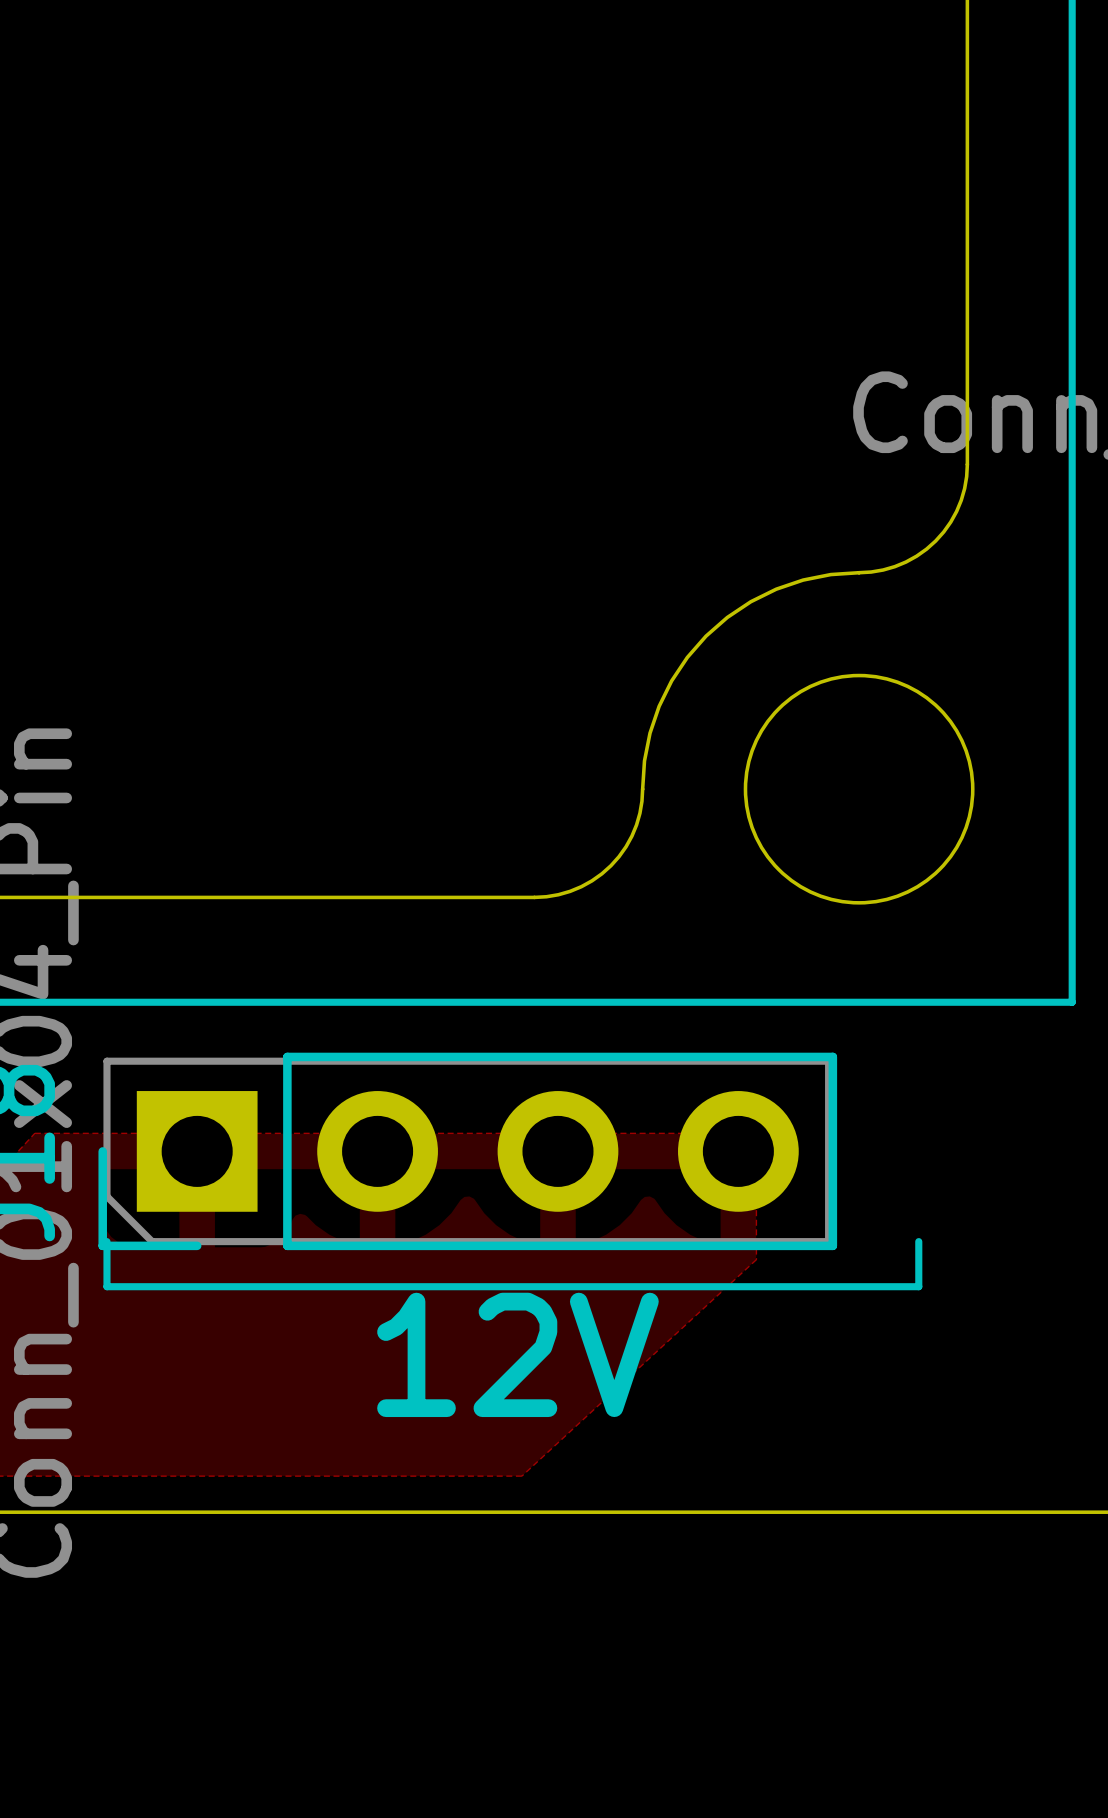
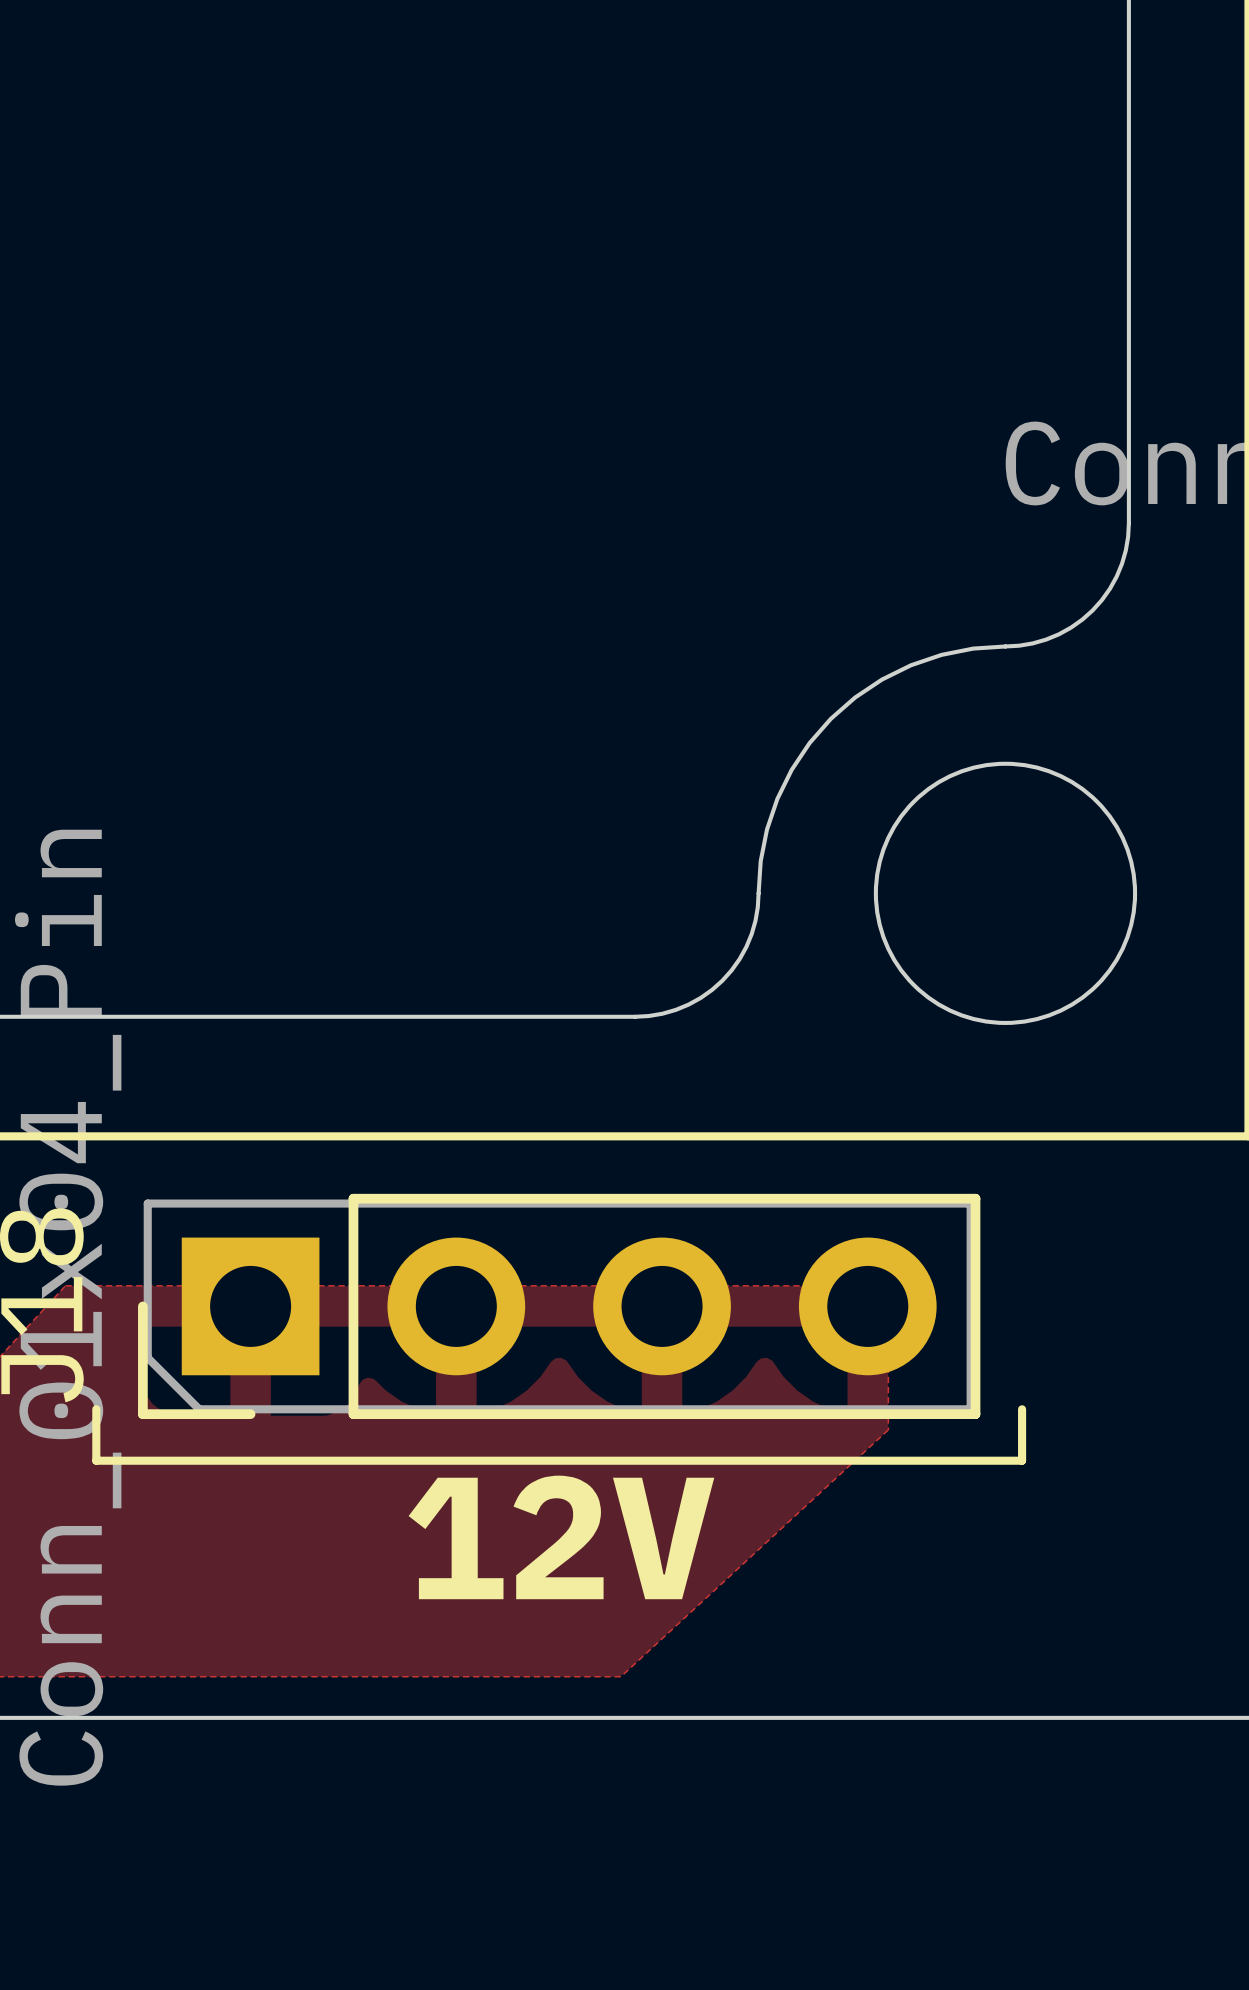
line: (106, 1241) (106, 1286) -> (96, 1409) (96, 1460) (147, 1460)
line: (918, 1241) (918, 1286) (873, 1286) -> (1022, 1409) (1022, 1460)
text position: 12V (517, 1354) -> 12V (561, 1537)

